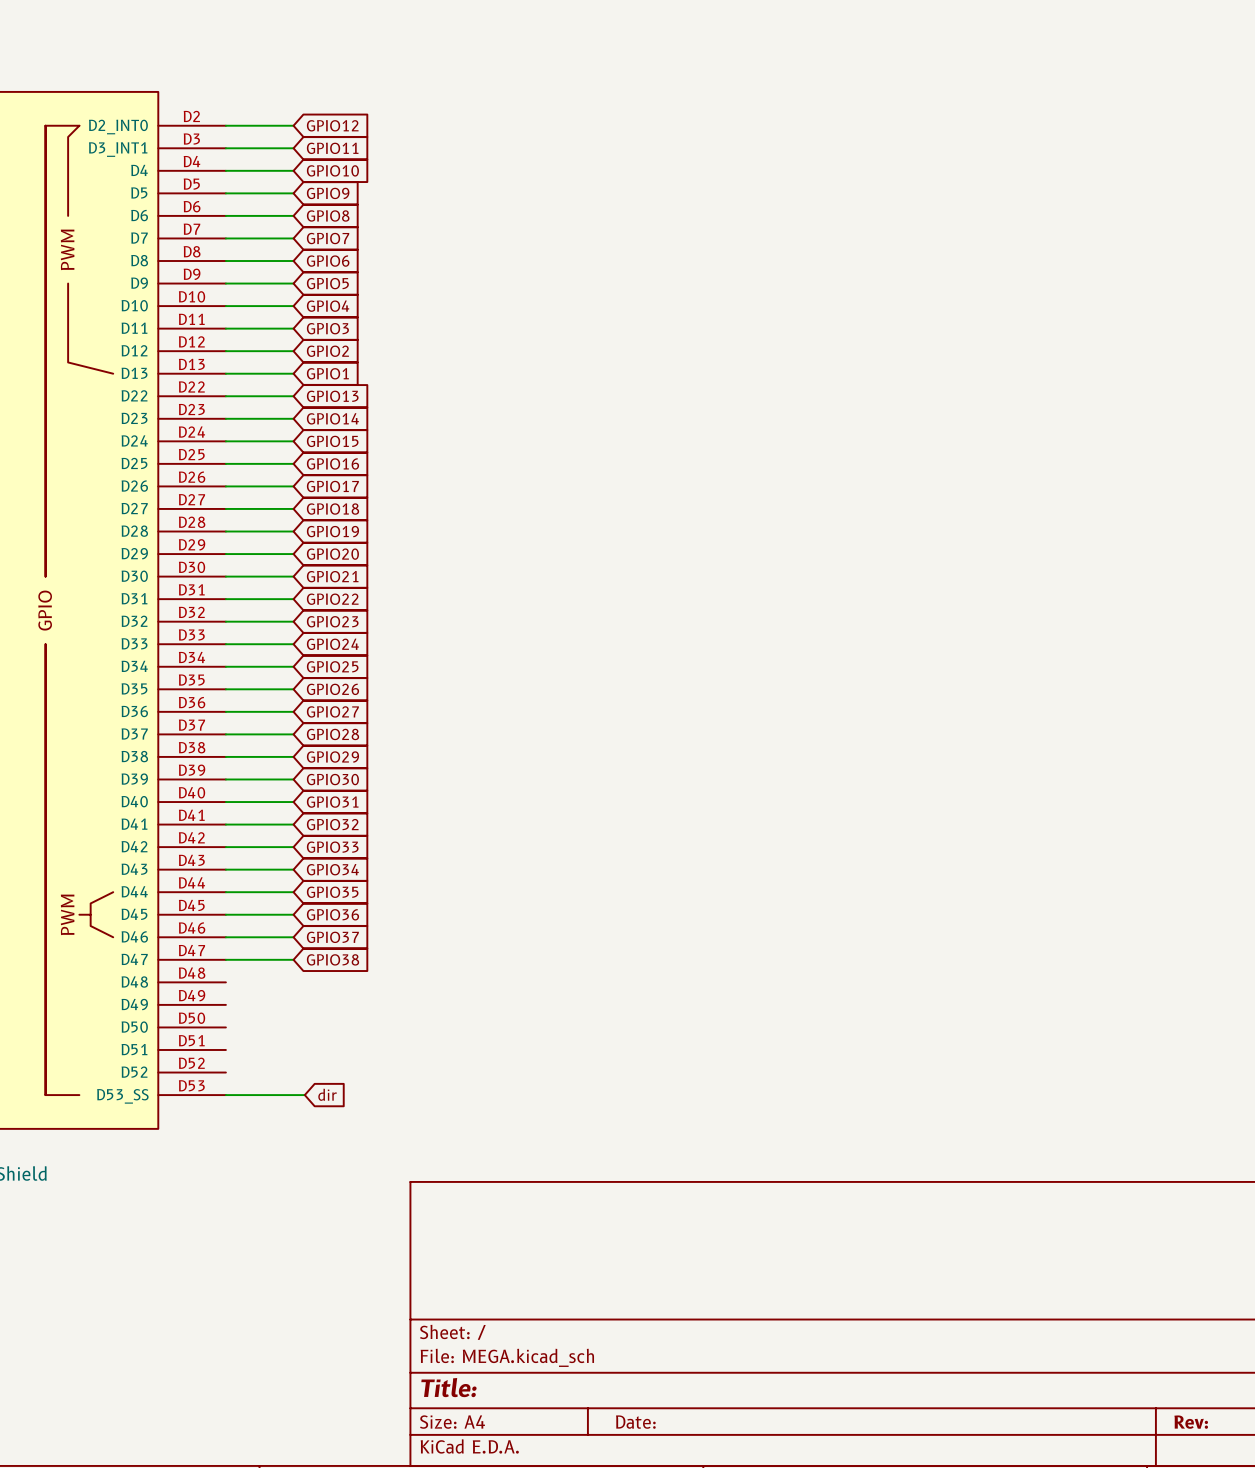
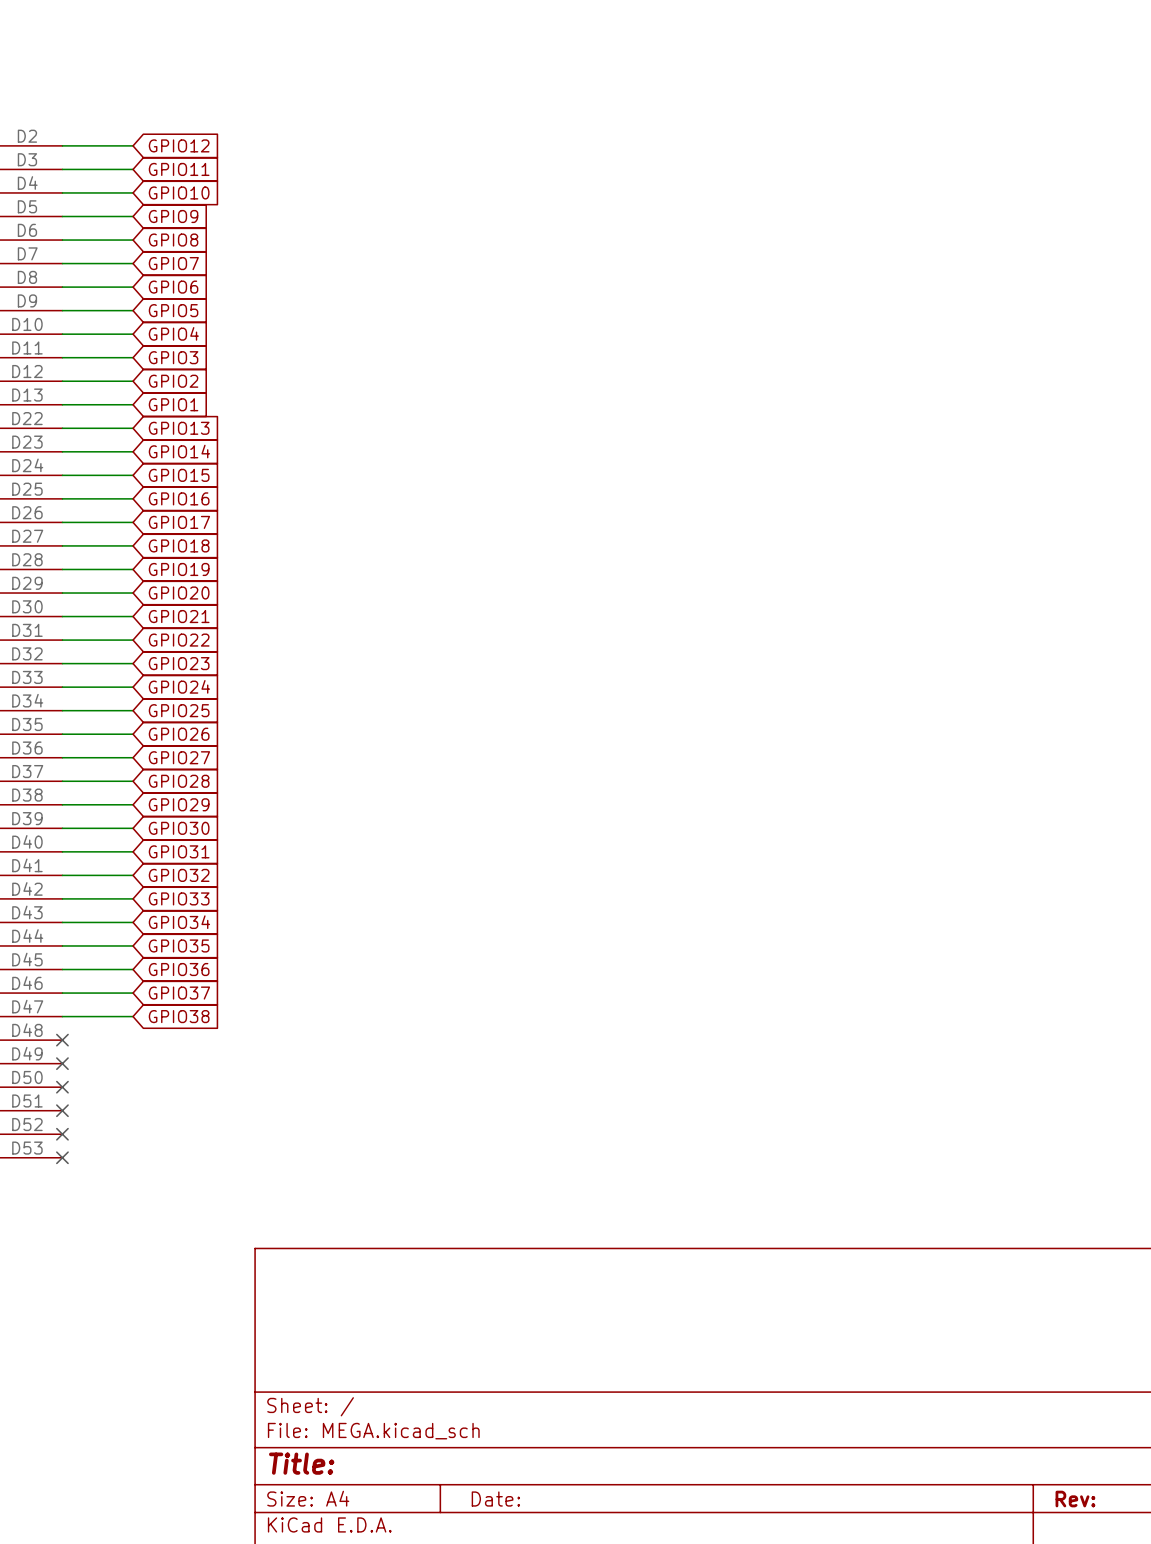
no-connect mark: none -> (62, 1040)
no-connect mark: none -> (62, 1063)
no-connect mark: none -> (62, 1087)
no-connect mark: none -> (62, 1110)
no-connect mark: none -> (62, 1134)
global label: dir (327, 1094) -> none
wire: (225, 1095) (304, 1095) -> none
no-connect mark: none -> (62, 1157)

